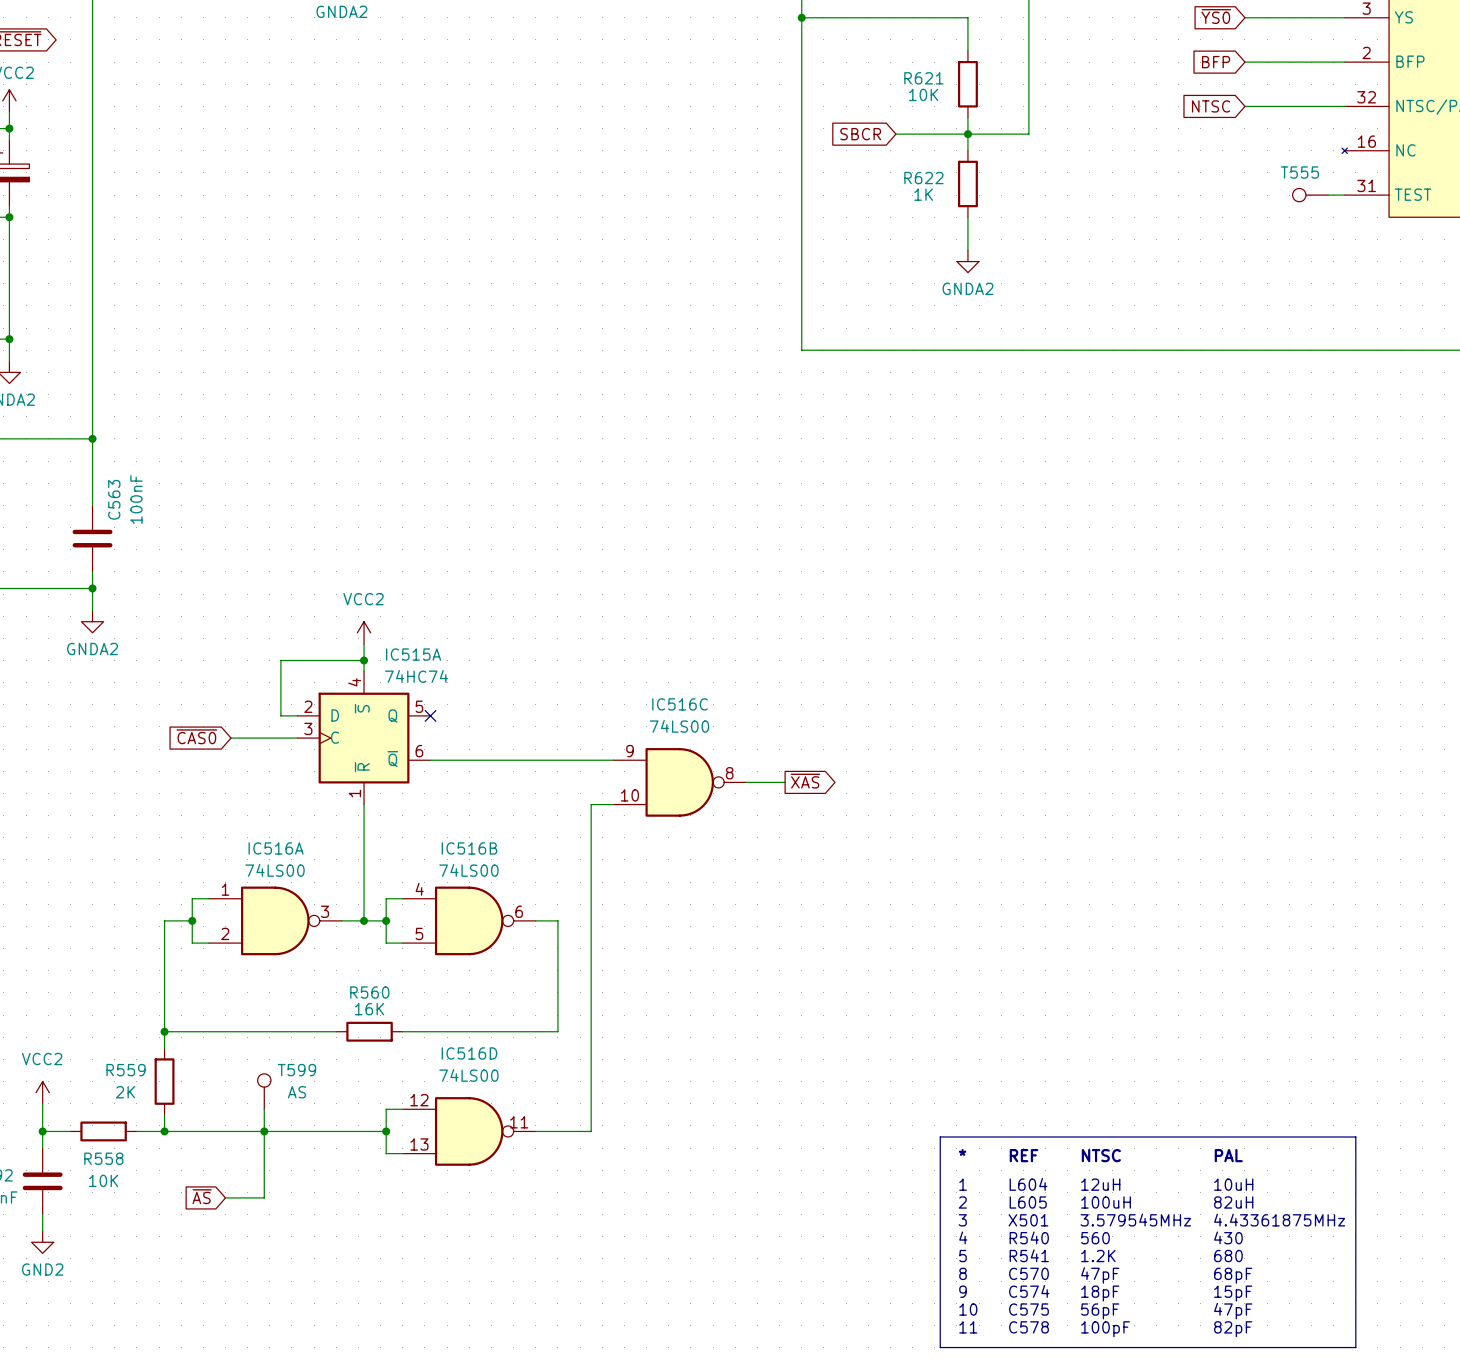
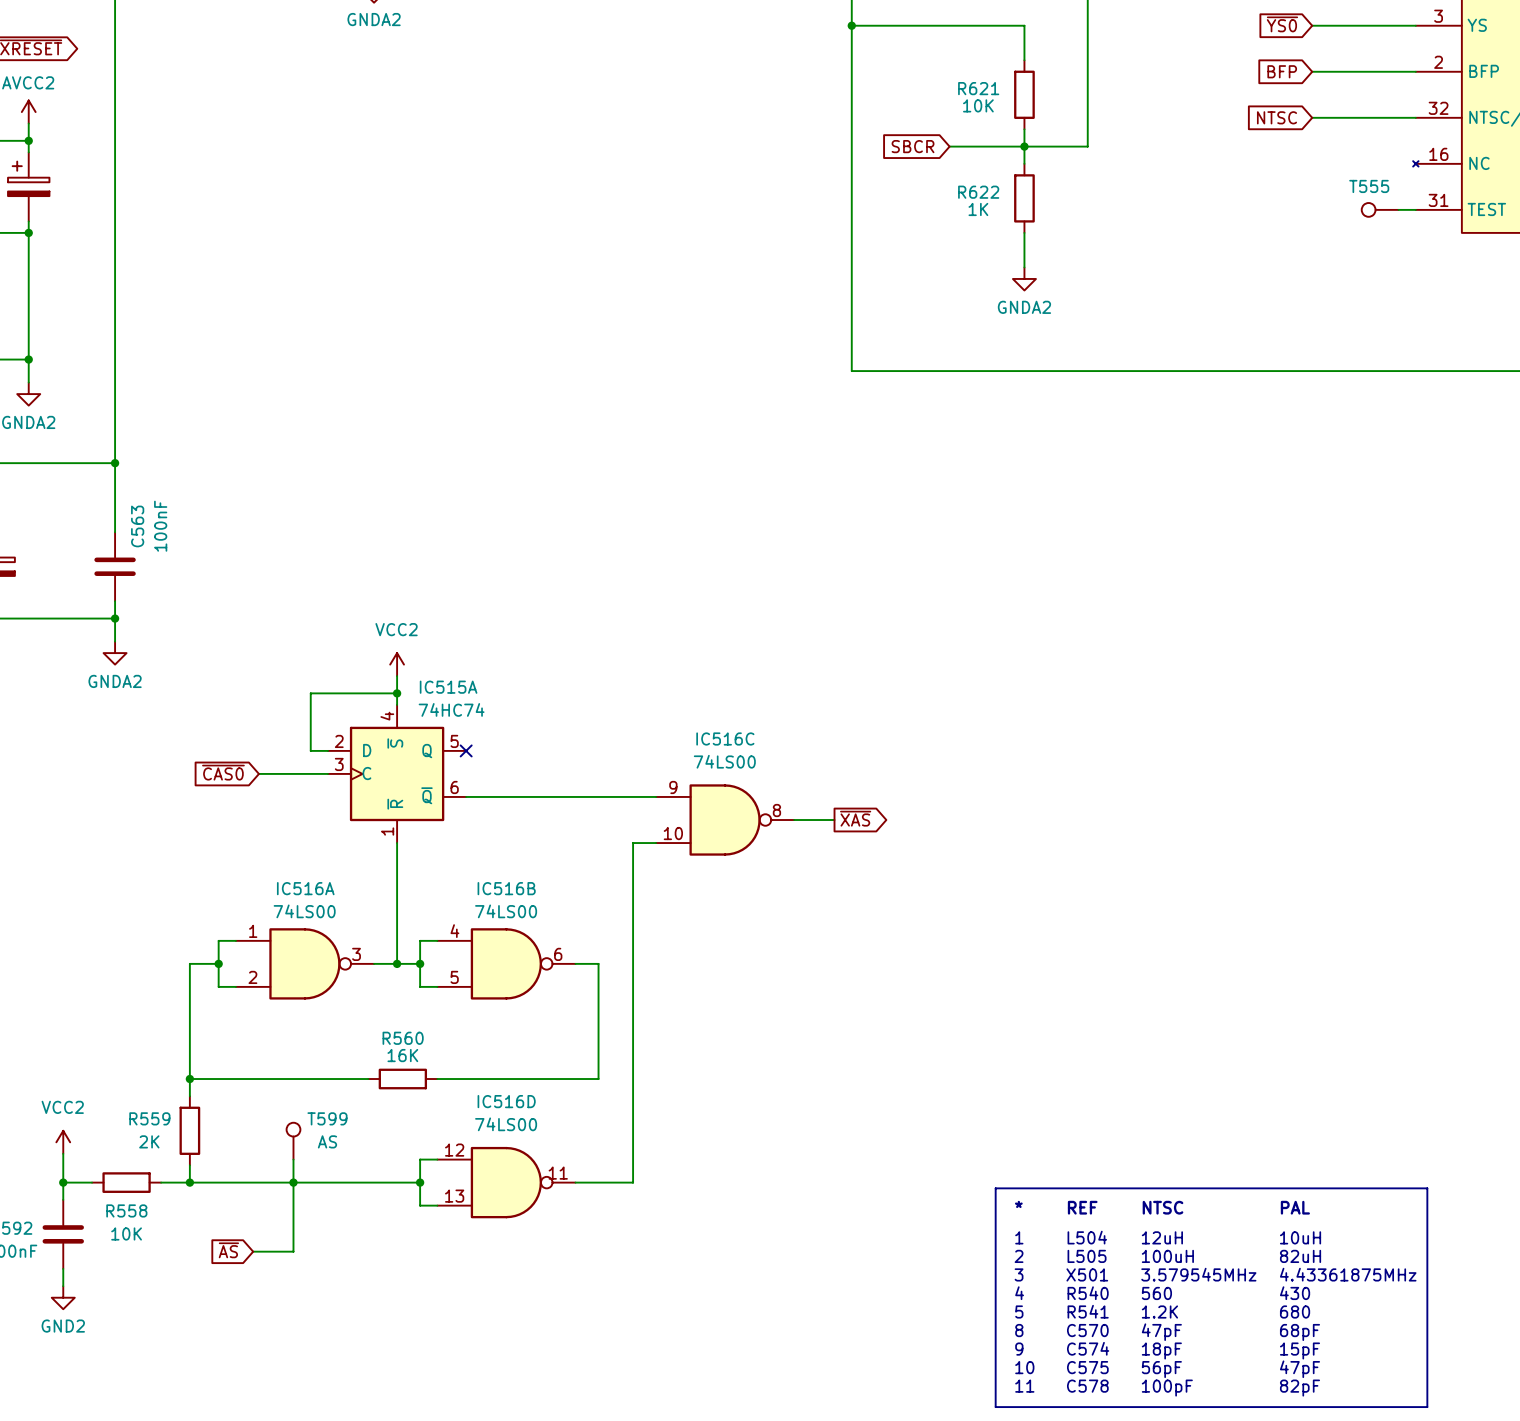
text: L604 (1028, 1184) -> L504 (1087, 1237)
text: L605 (1028, 1202) -> L505 (1087, 1256)

